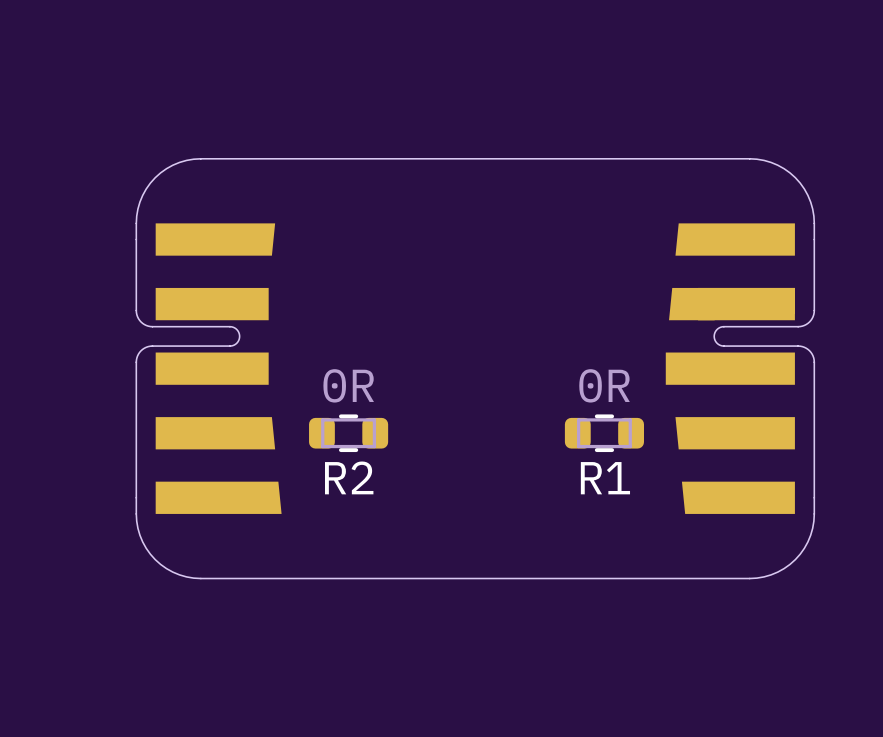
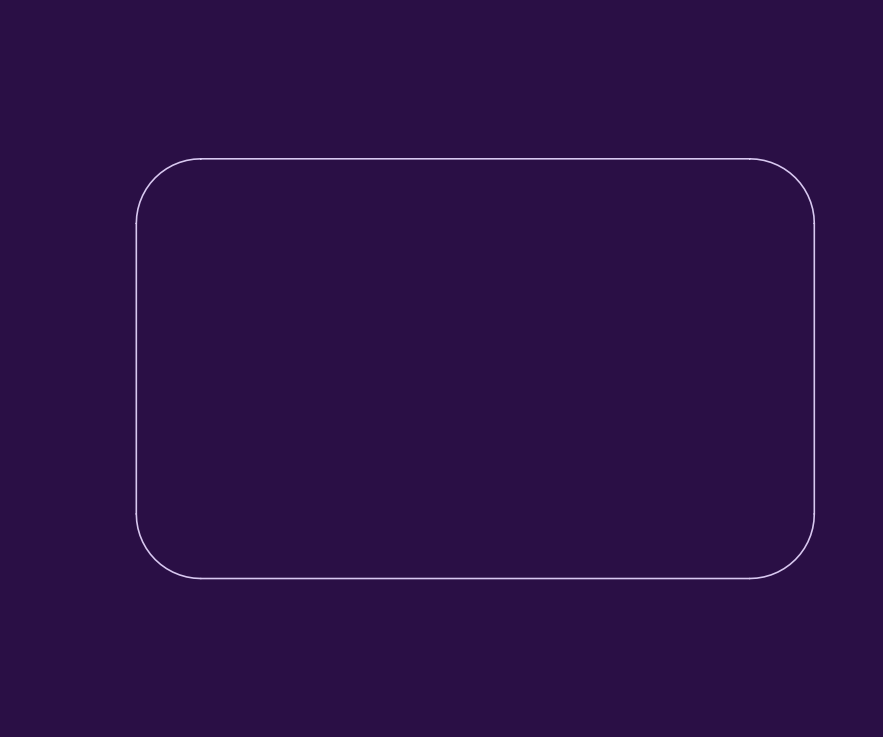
board edge: none -> (136, 239) (136, 497)
board edge: none -> (814, 239) (814, 497)
part: (208, 368) -> none
part: (740, 368) -> none
R2: 0R (348, 433) -> none
R1: 0R (604, 433) -> none

